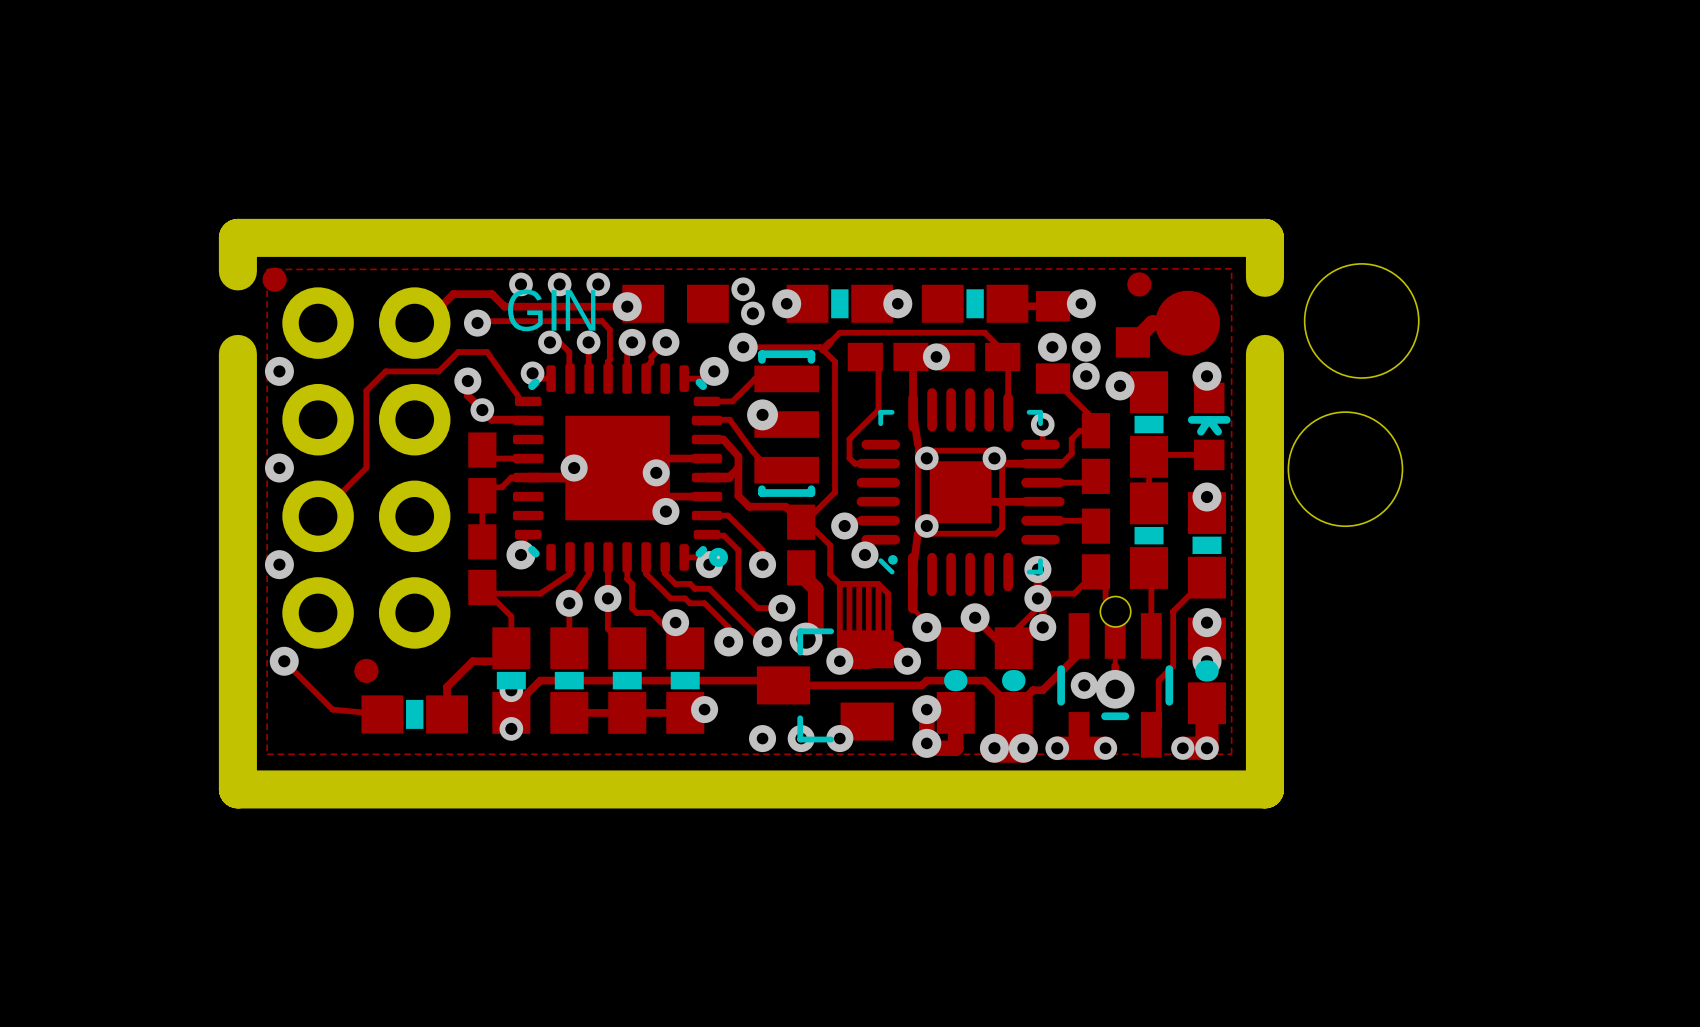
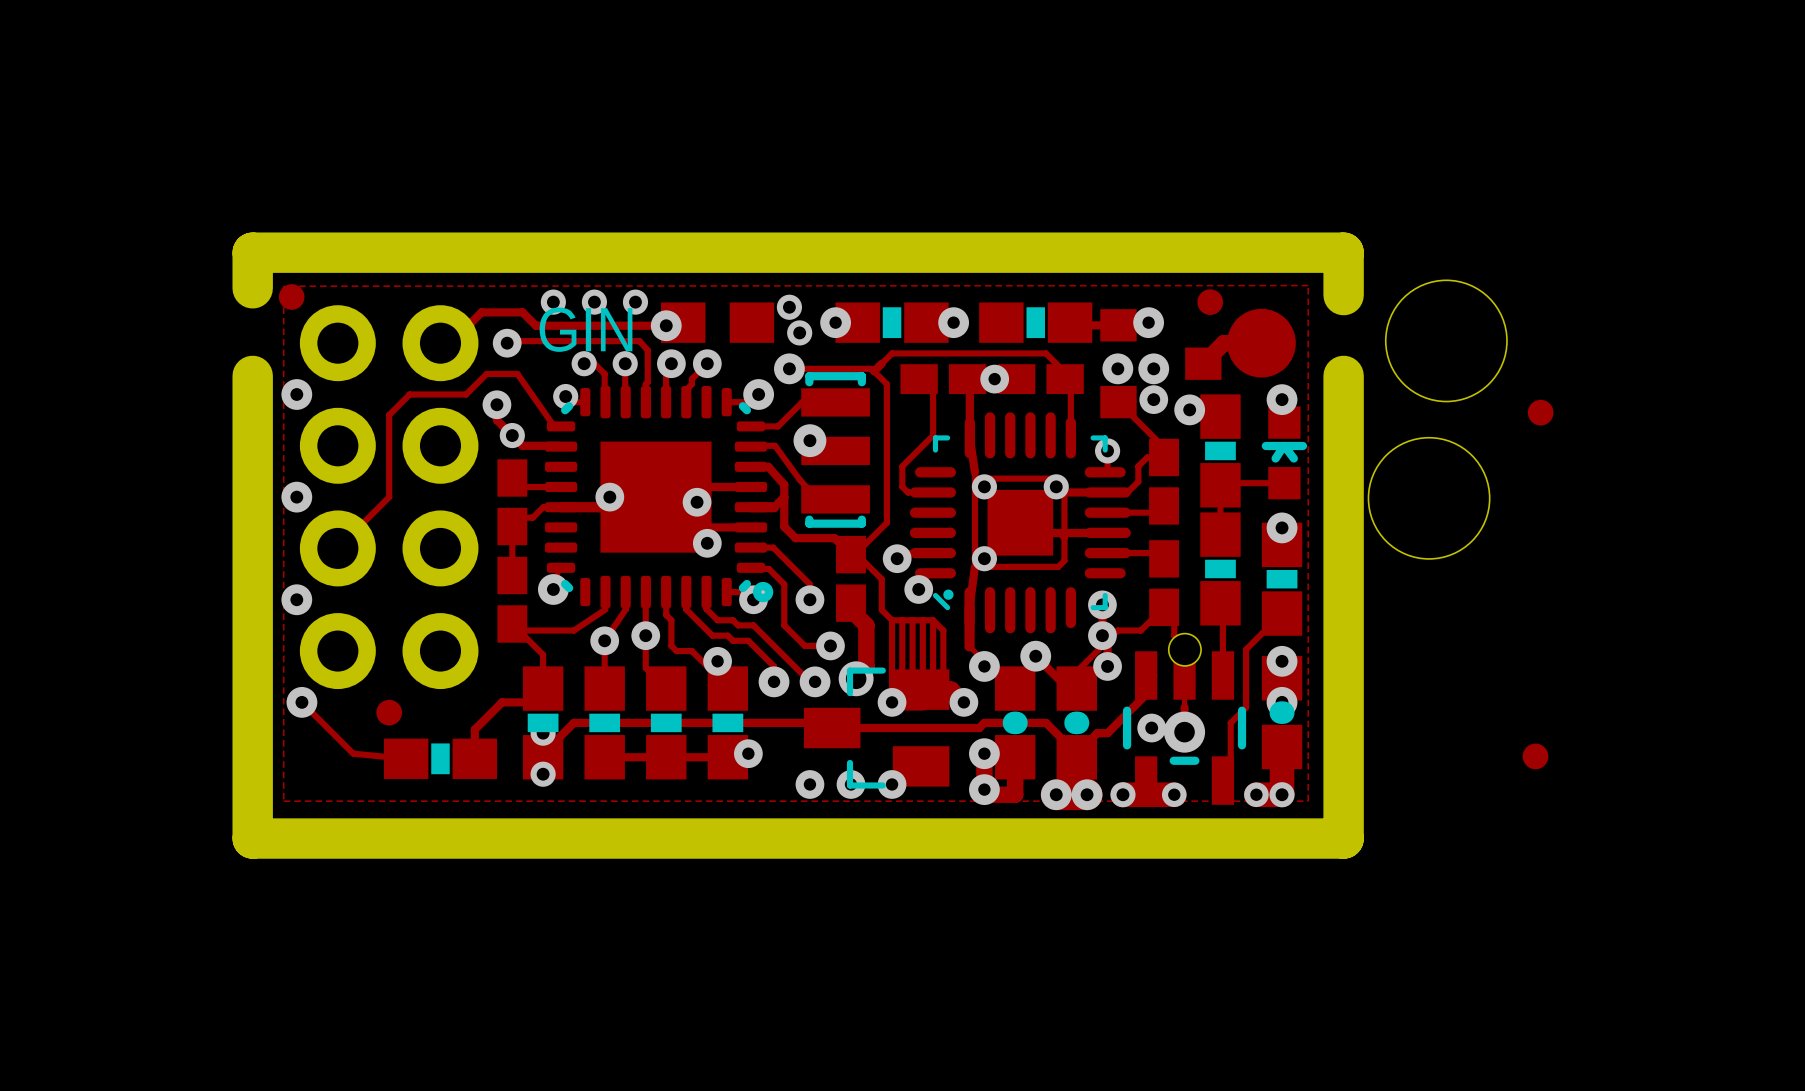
part: none -> (1540, 412)
part: none -> (1535, 756)

